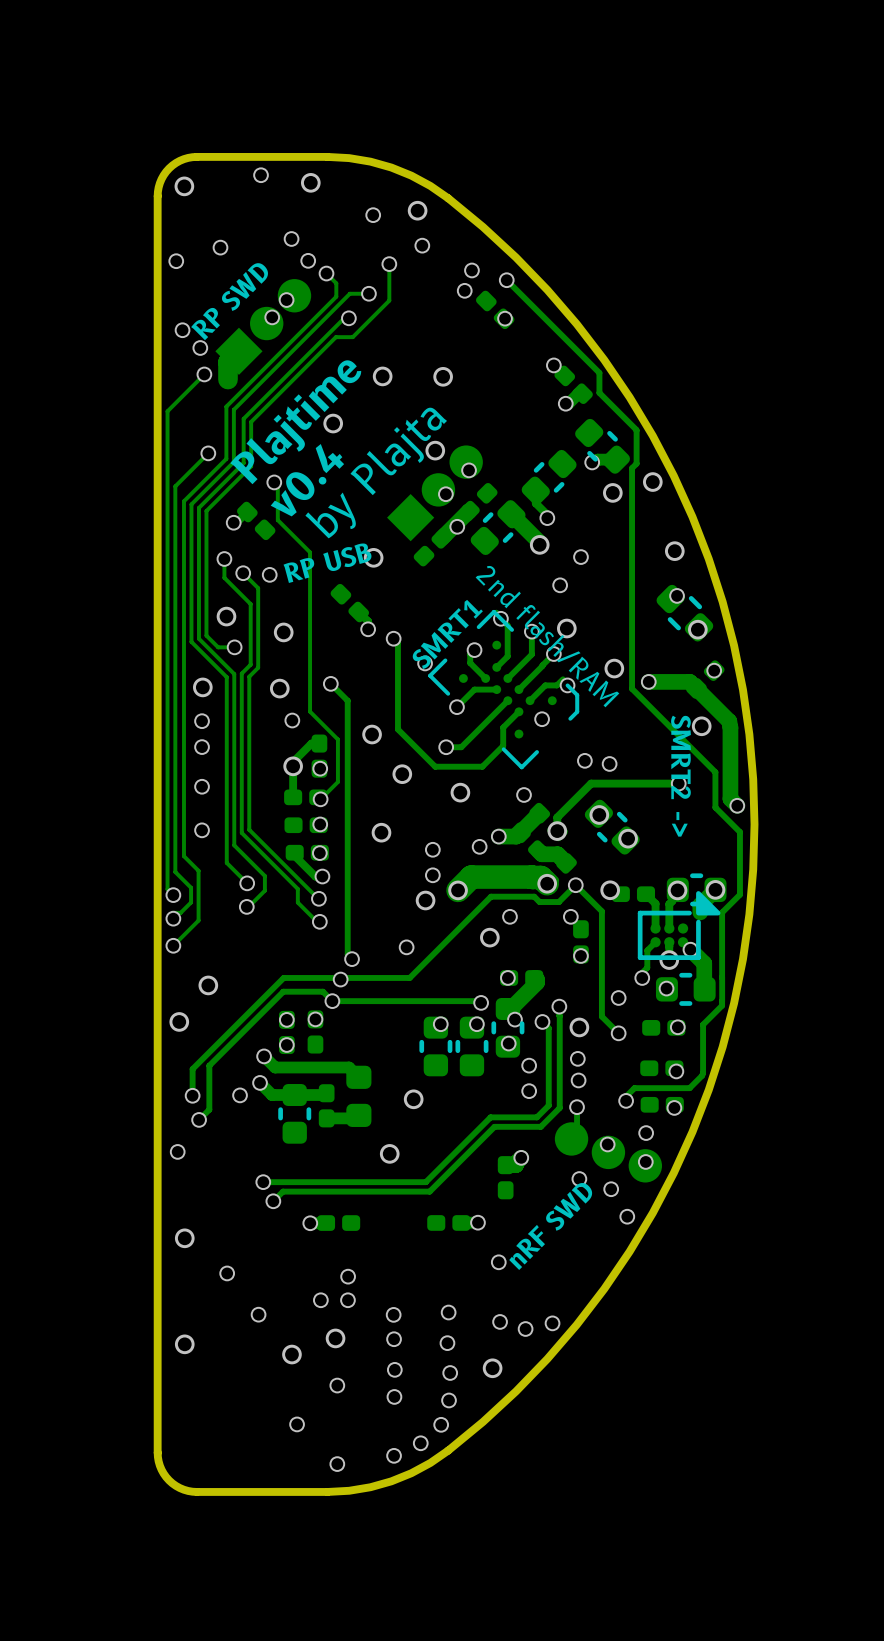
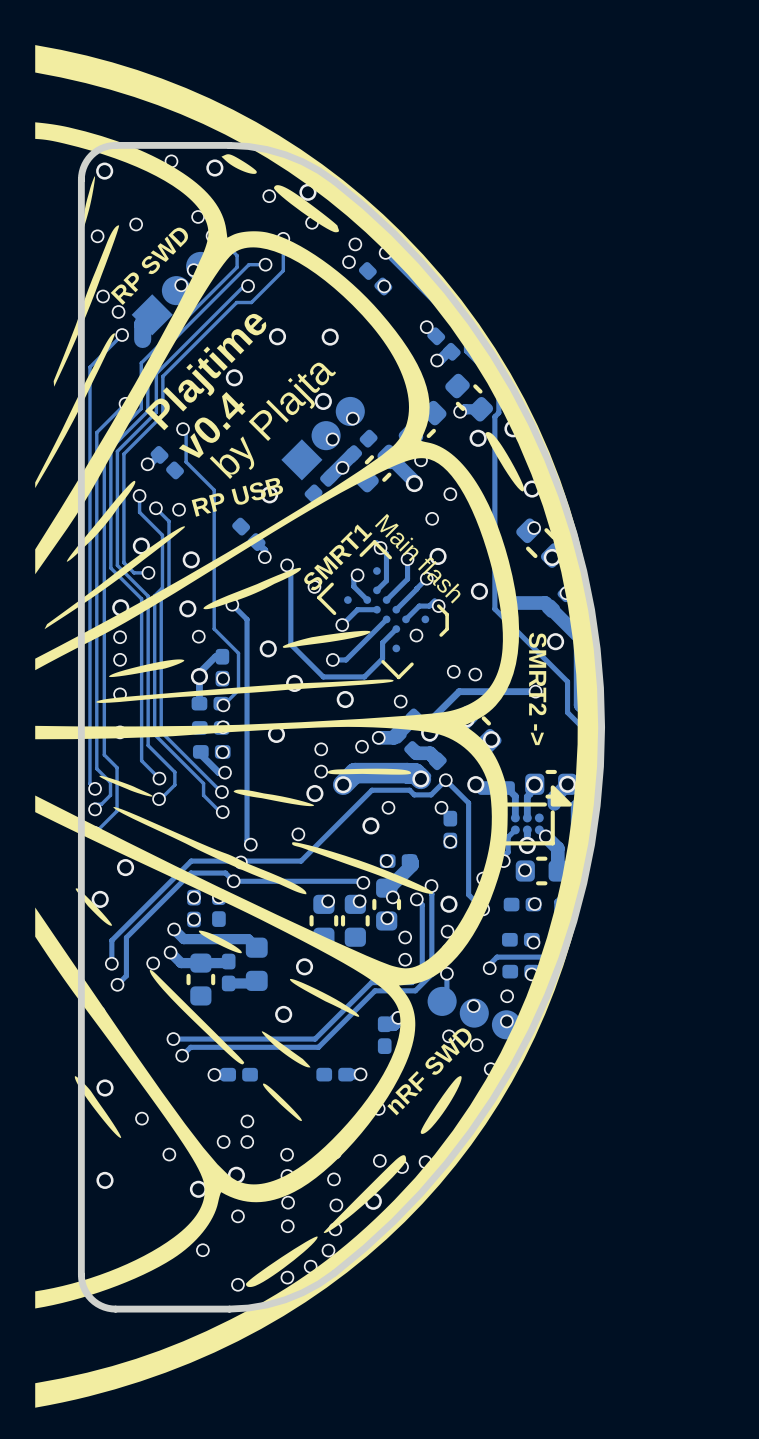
drawing: none -> [35, 45, 602, 1408]
text: 2nd flash/RAM (547, 636) -> Main flash (417, 558)

